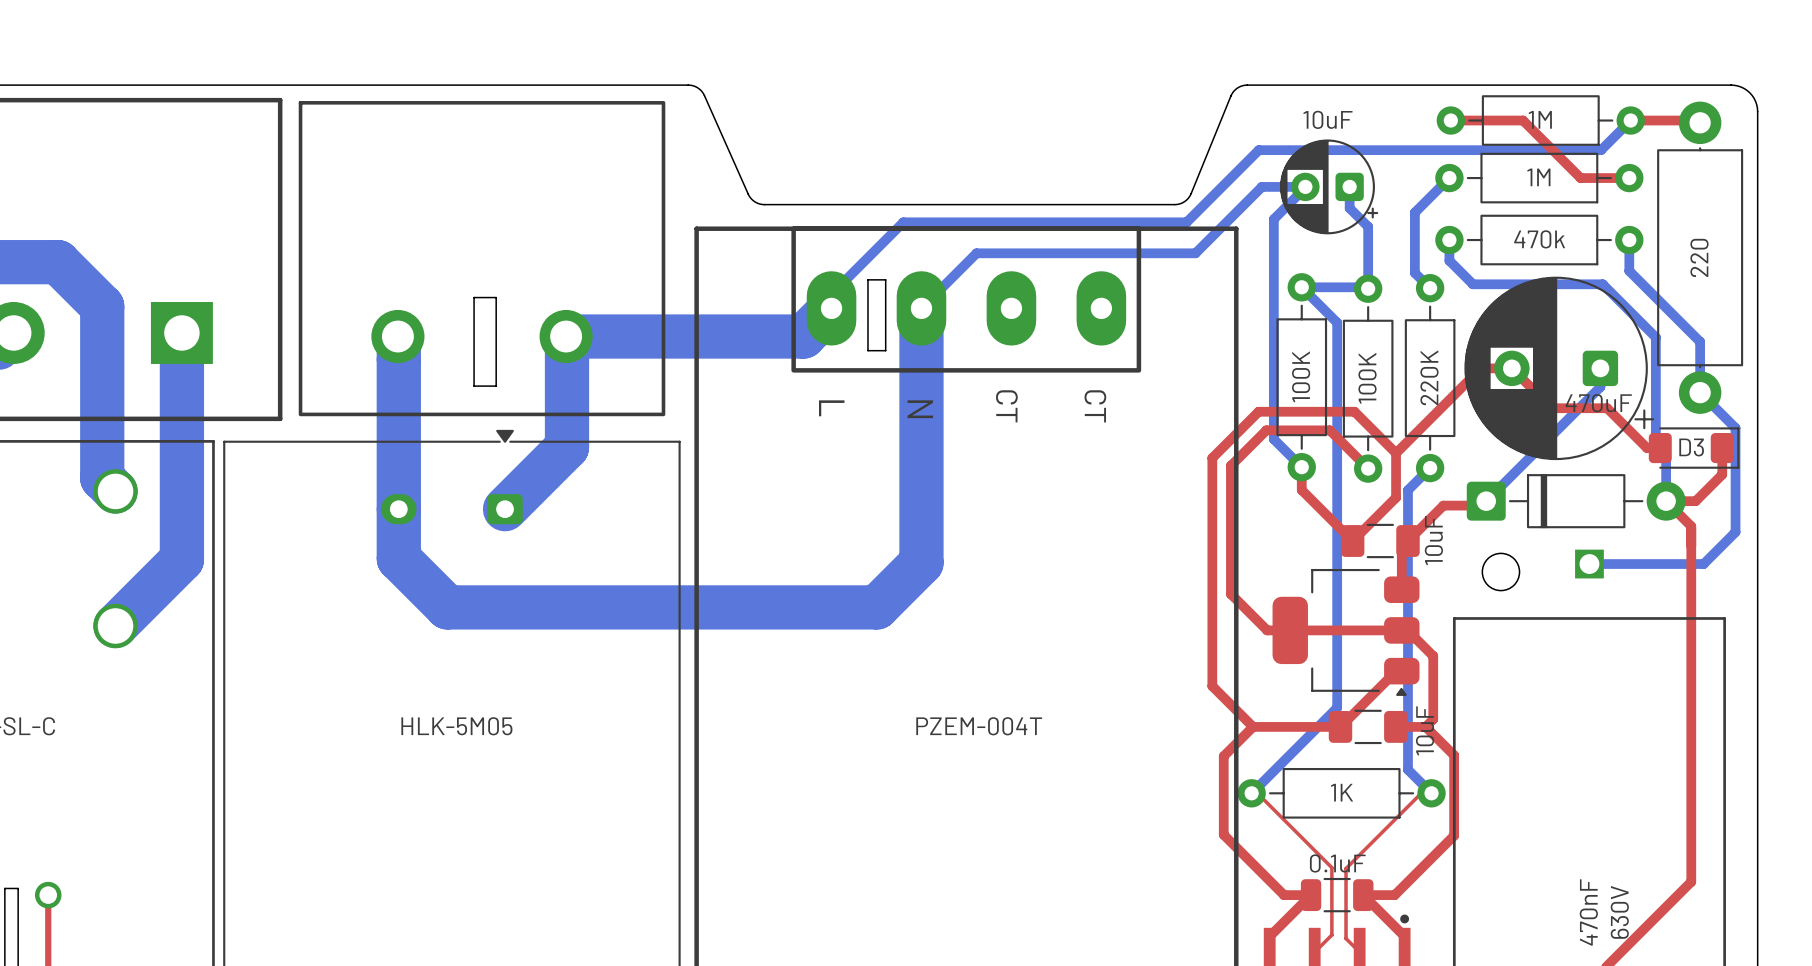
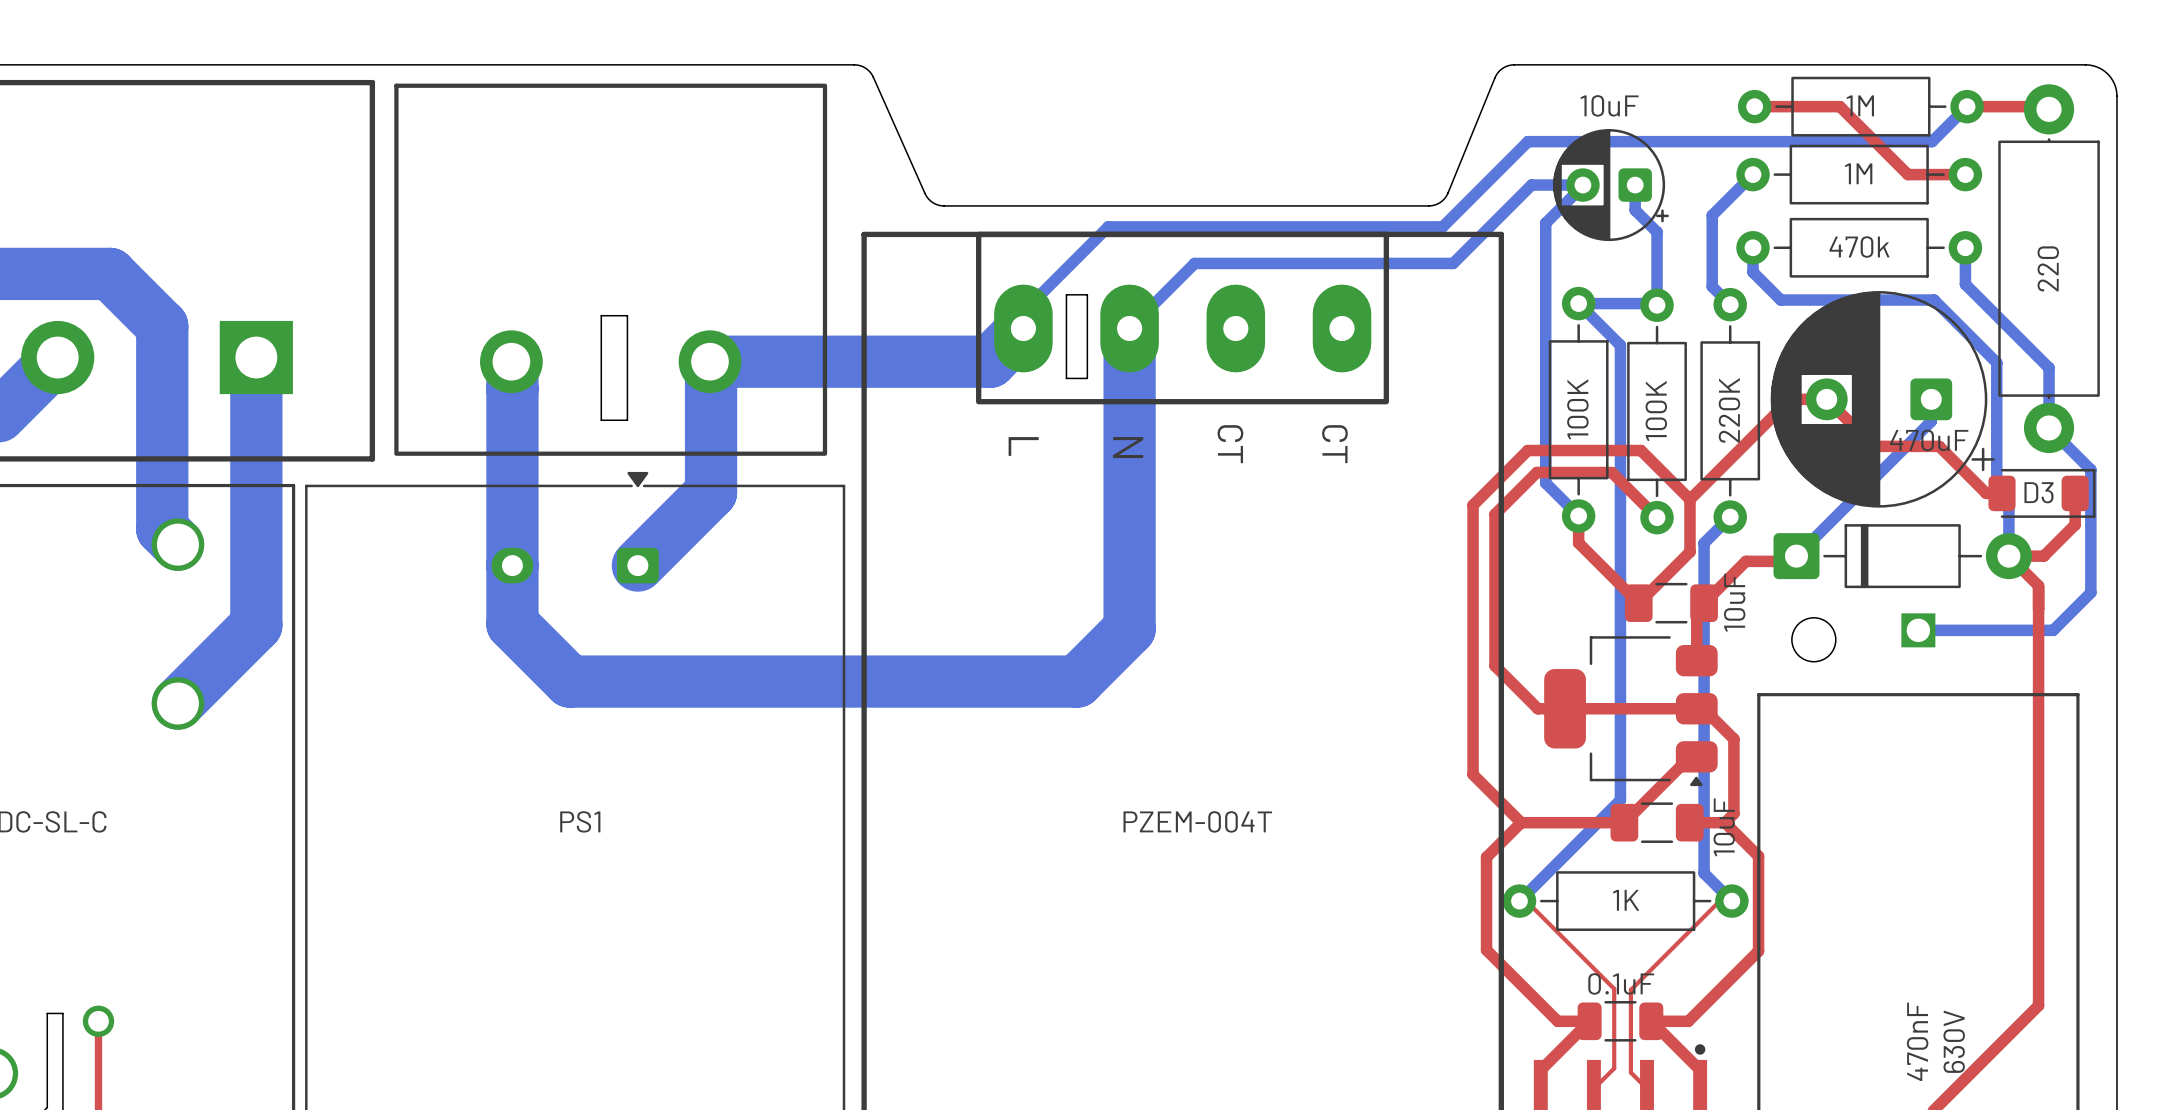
HLK-5M05 name: HLK-5M05 (456, 726) -> PS1 (580, 821)

